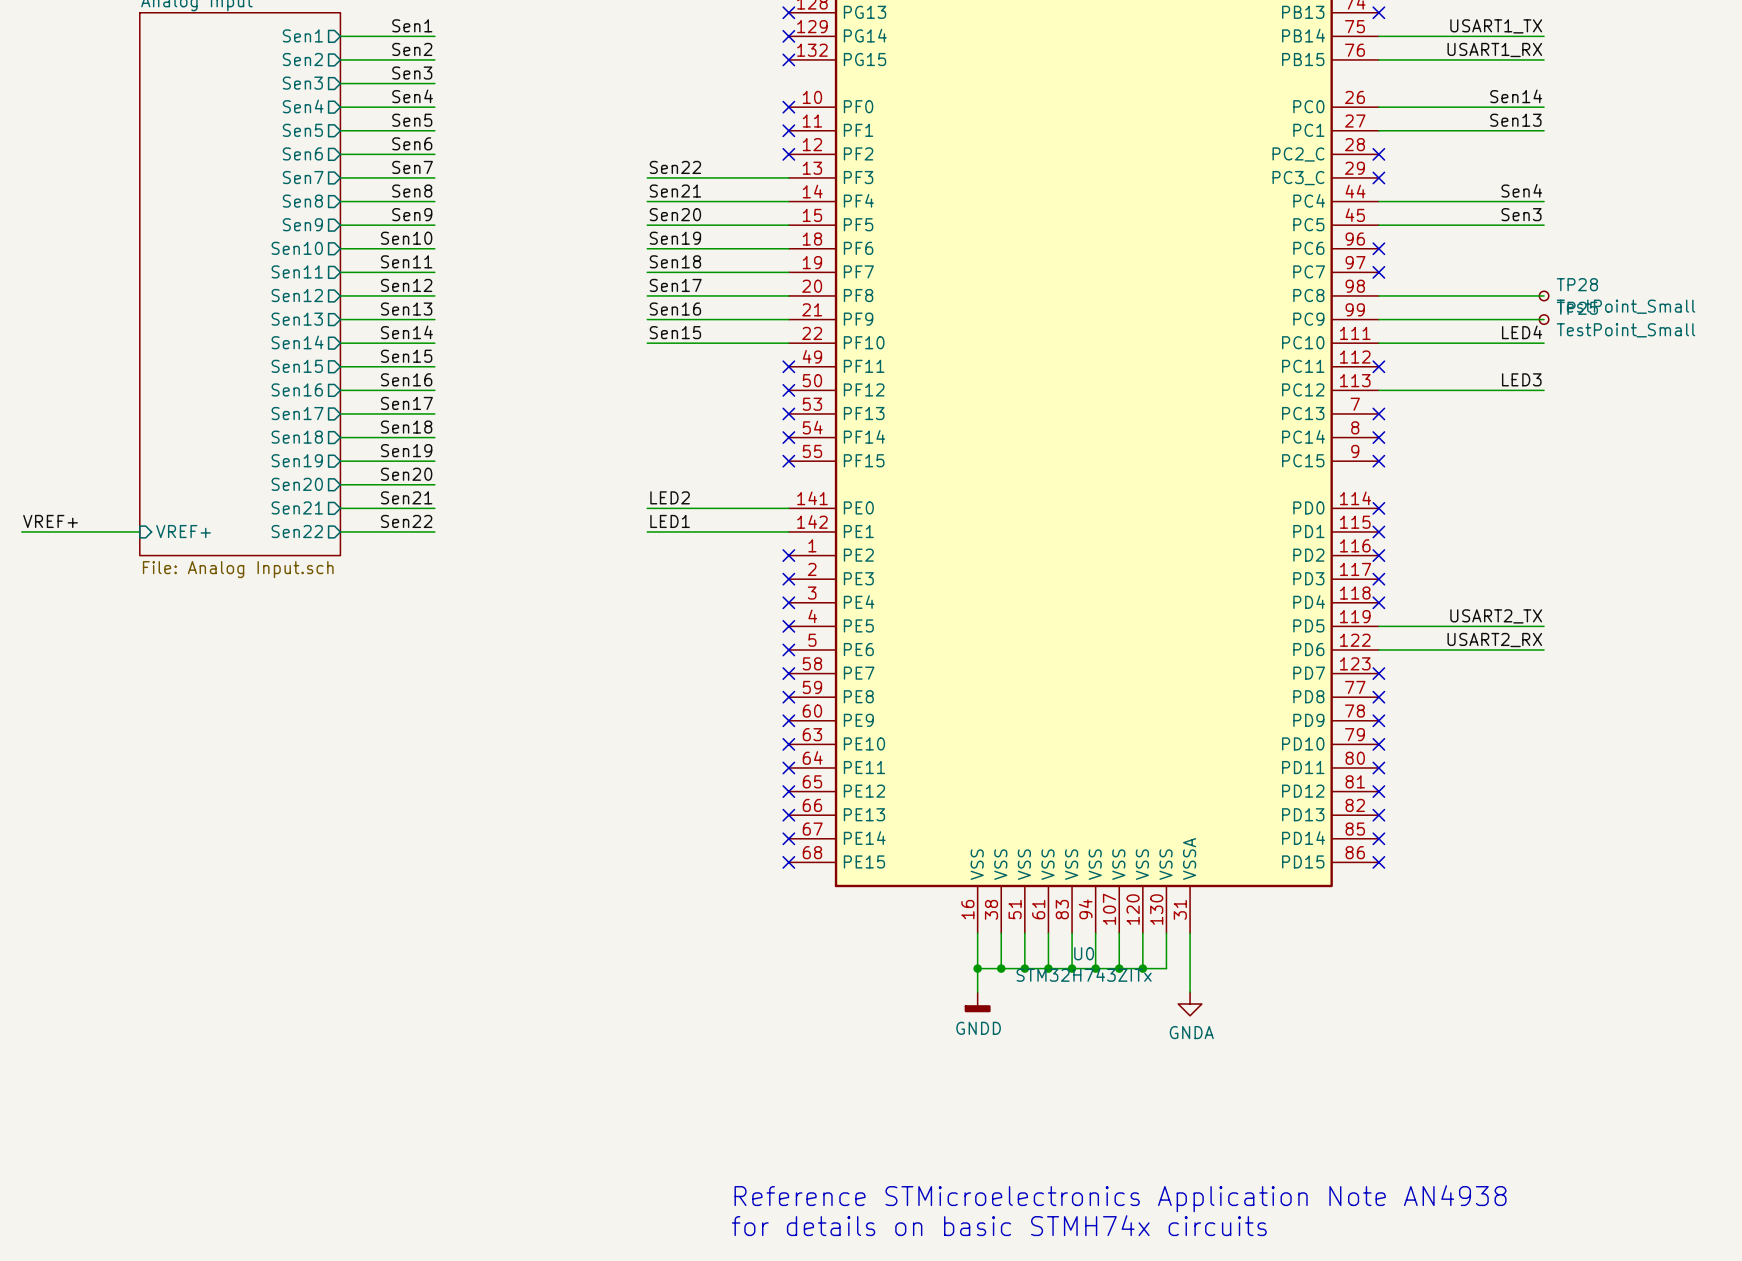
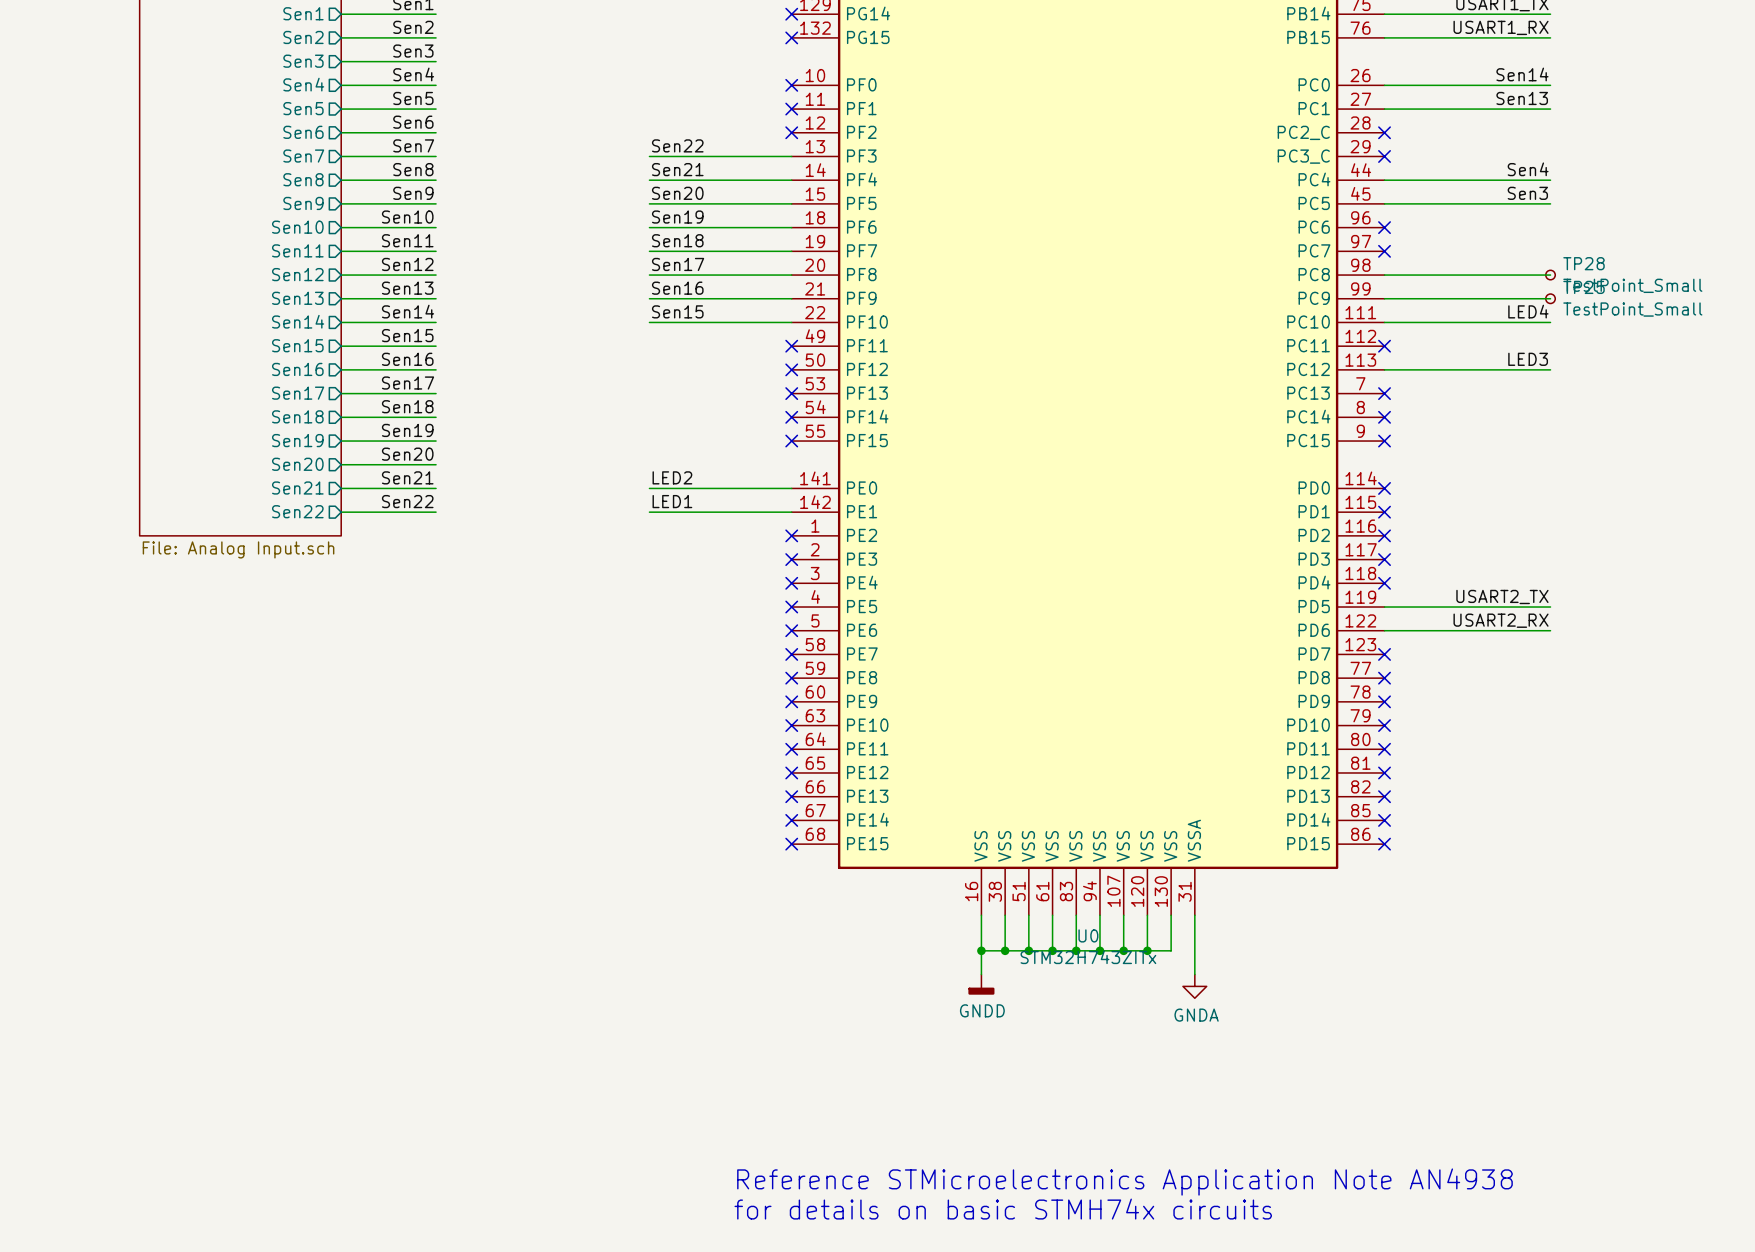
label: VREF+ (50, 521) -> none
wire: (21, 531) (139, 531) -> none
sheet pin: VREF+ (183, 531) -> none

